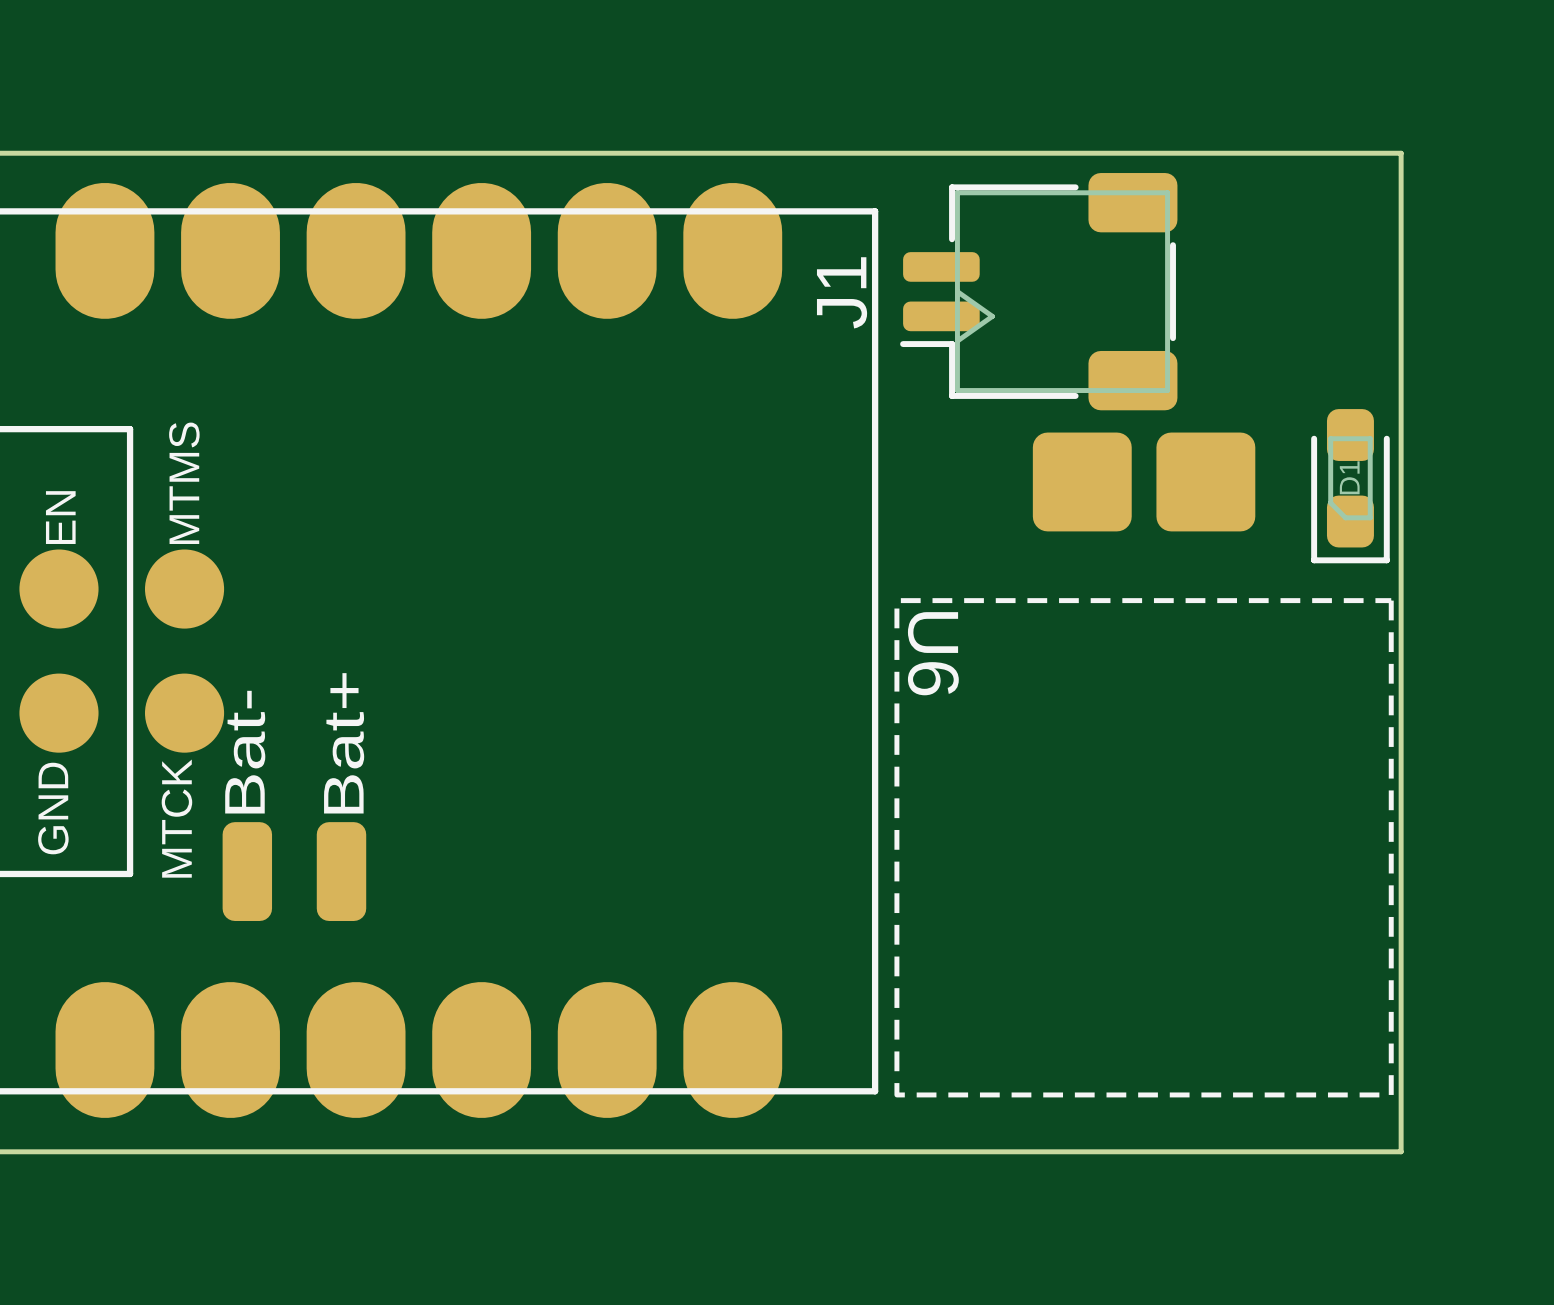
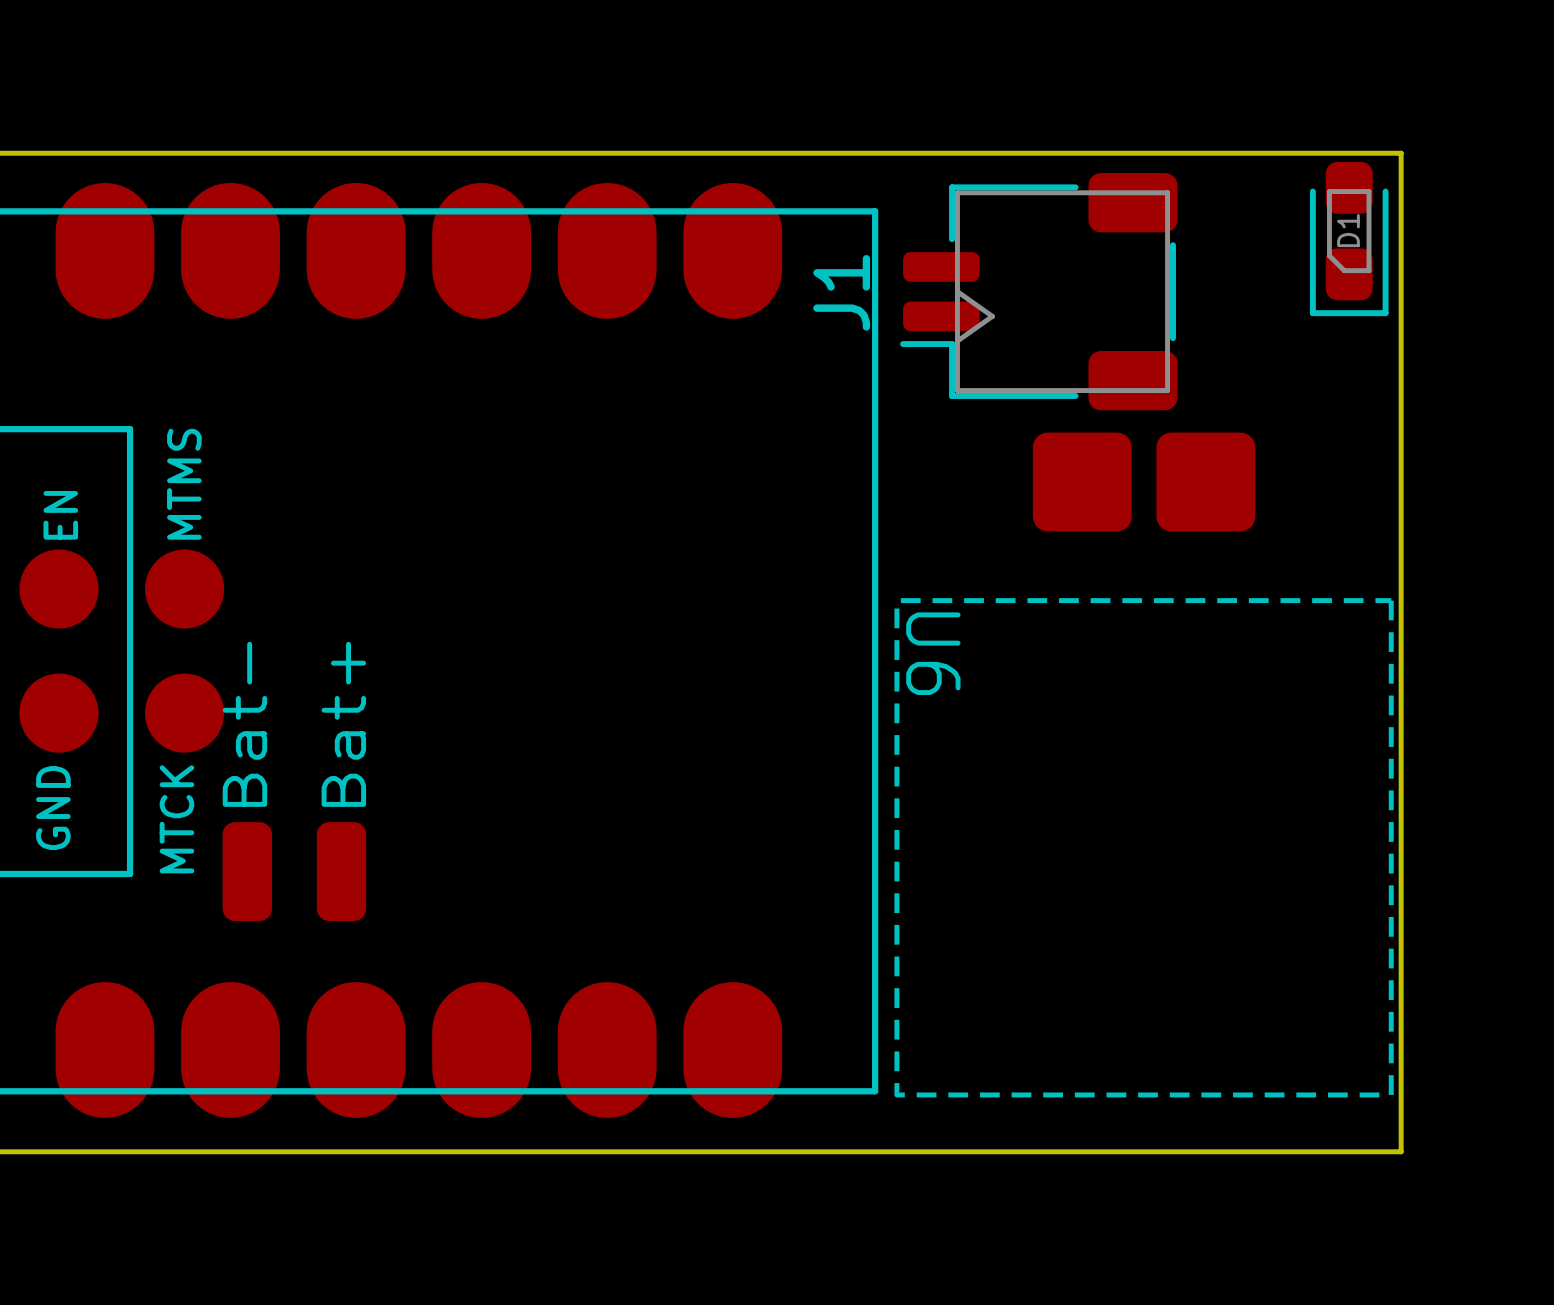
D1 position: (1350, 486) -> (1349, 239)

